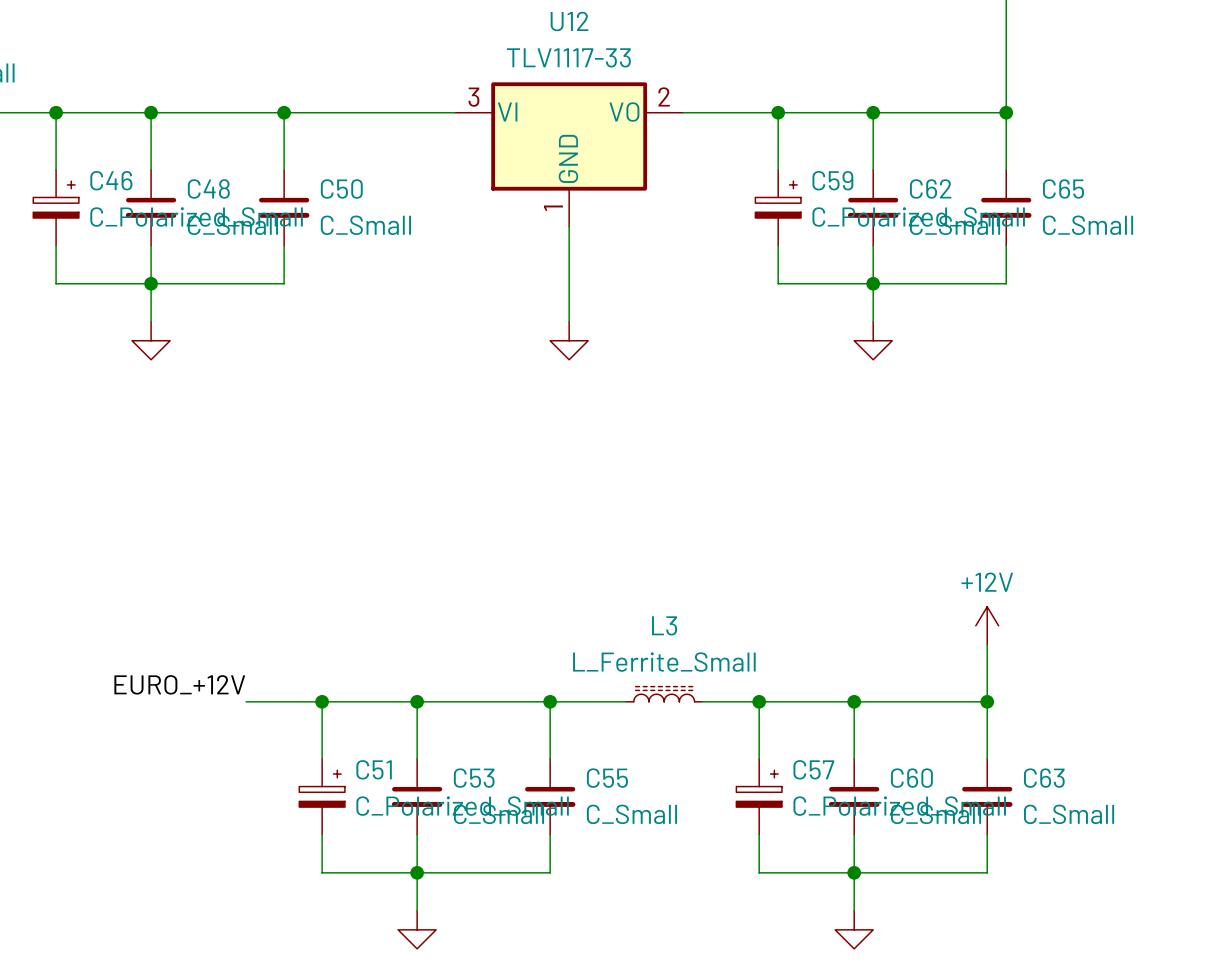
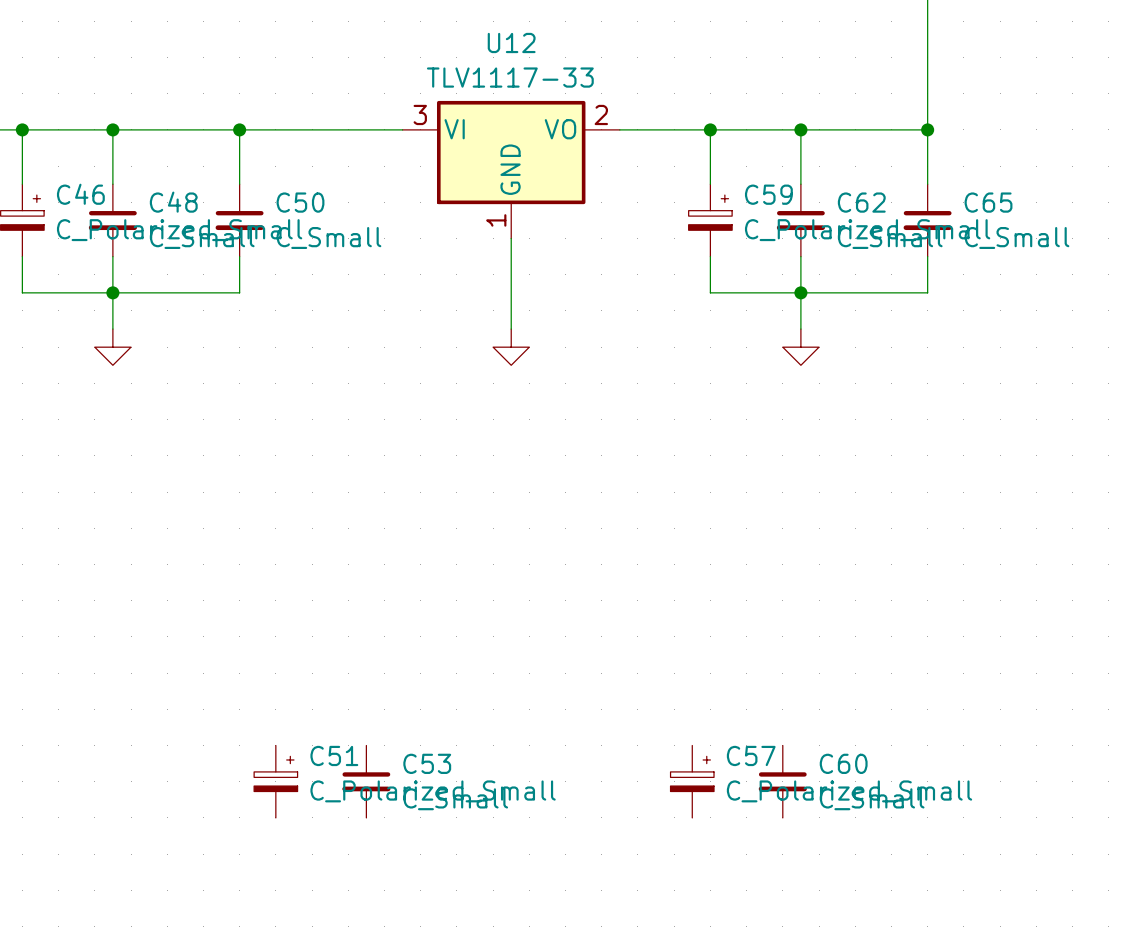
power symbol: +12V (987, 625) -> none
wire: (987, 644) (987, 758) -> none
label: EURO_+12V (179, 684) -> none
L3: L_Ferrite_Small (664, 694) -> none
wire: (246, 701) (626, 701) -> none
wire: (322, 701) (322, 758) -> none
junction: (322, 701) -> none
wire: (417, 701) (417, 758) -> none
junction: (417, 701) -> none
wire: (550, 701) (550, 758) -> none
junction: (550, 701) -> none
wire: (702, 701) (987, 701) -> none
wire: (759, 701) (759, 758) -> none
junction: (759, 701) -> none
wire: (854, 701) (854, 758) -> none
junction: (854, 701) -> none
junction: (987, 701) -> none
C55: C_Small (550, 796) -> none
C63: C_Small (987, 796) -> none
wire: (322, 834) (322, 872) (550, 872) (550, 834) -> none
wire: (417, 834) (417, 910) -> none
wire: (759, 834) (759, 872) (987, 872) (987, 834) -> none
wire: (854, 834) (854, 910) -> none
junction: (417, 872) -> none
junction: (854, 872) -> none
power symbol: (417, 929) -> none
power symbol: (854, 929) -> none

